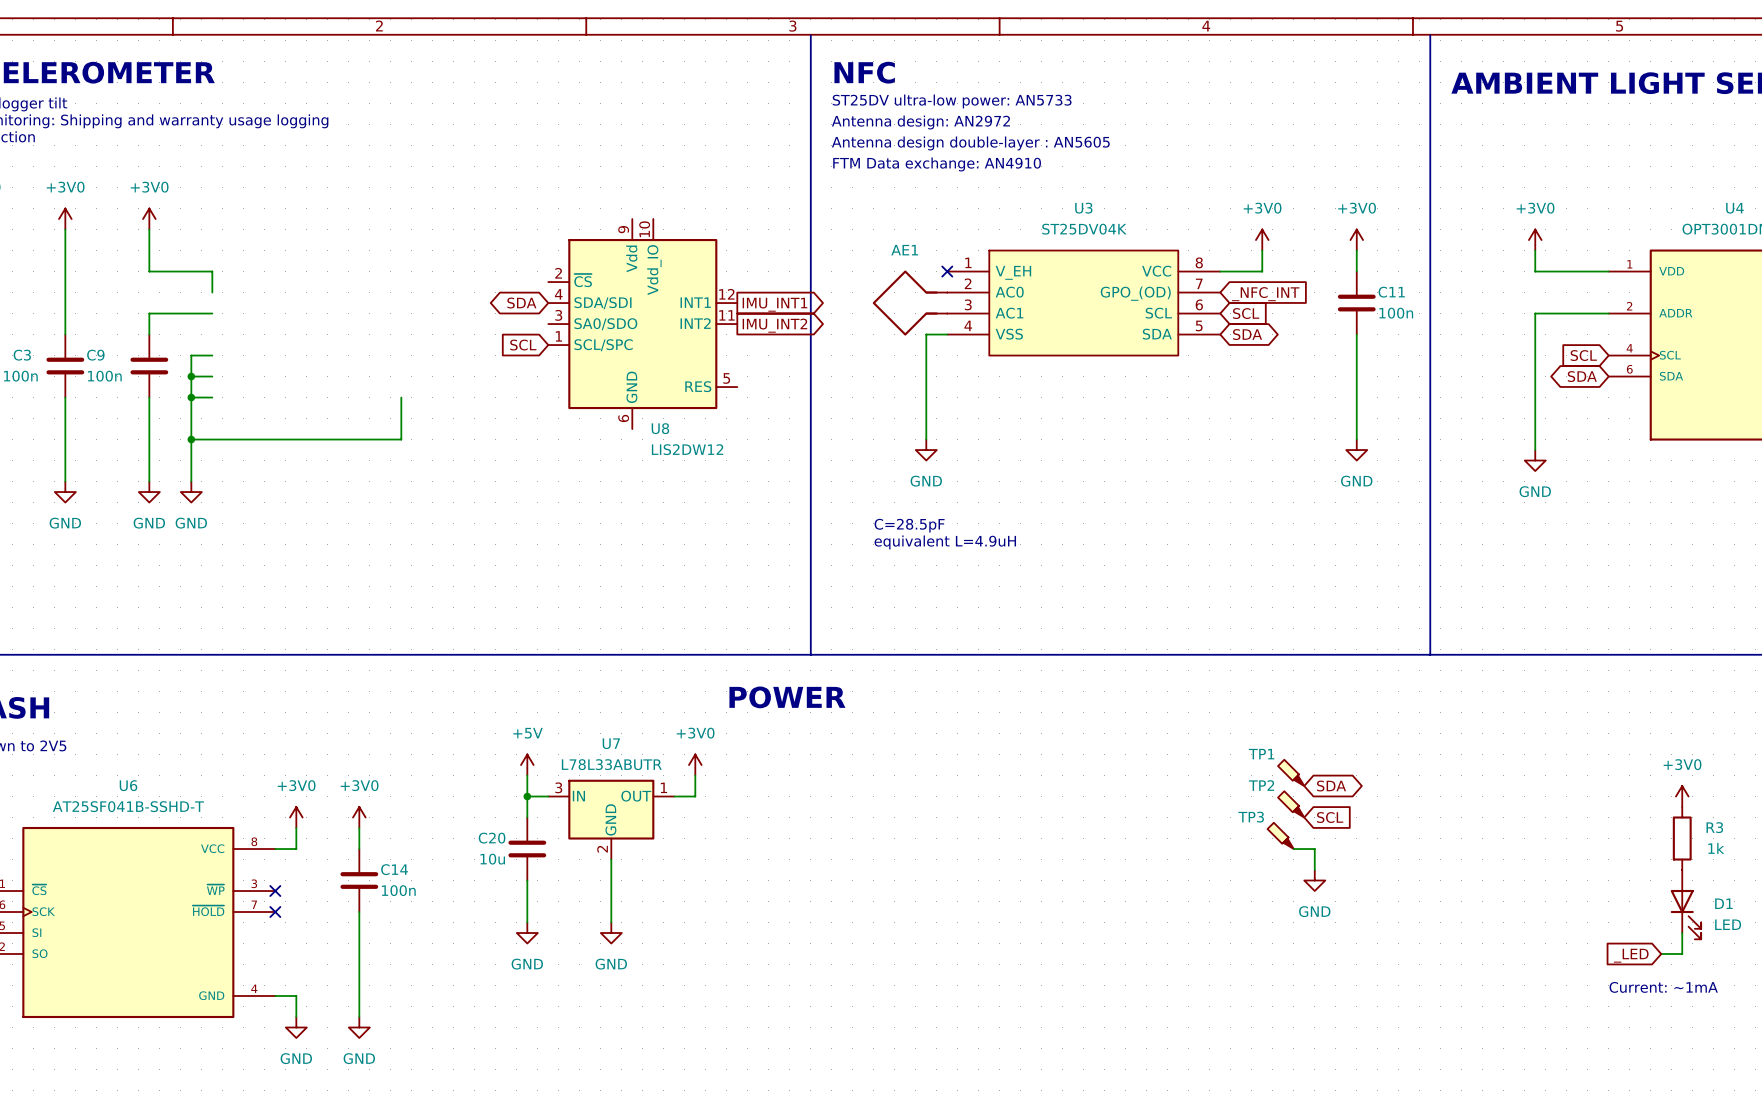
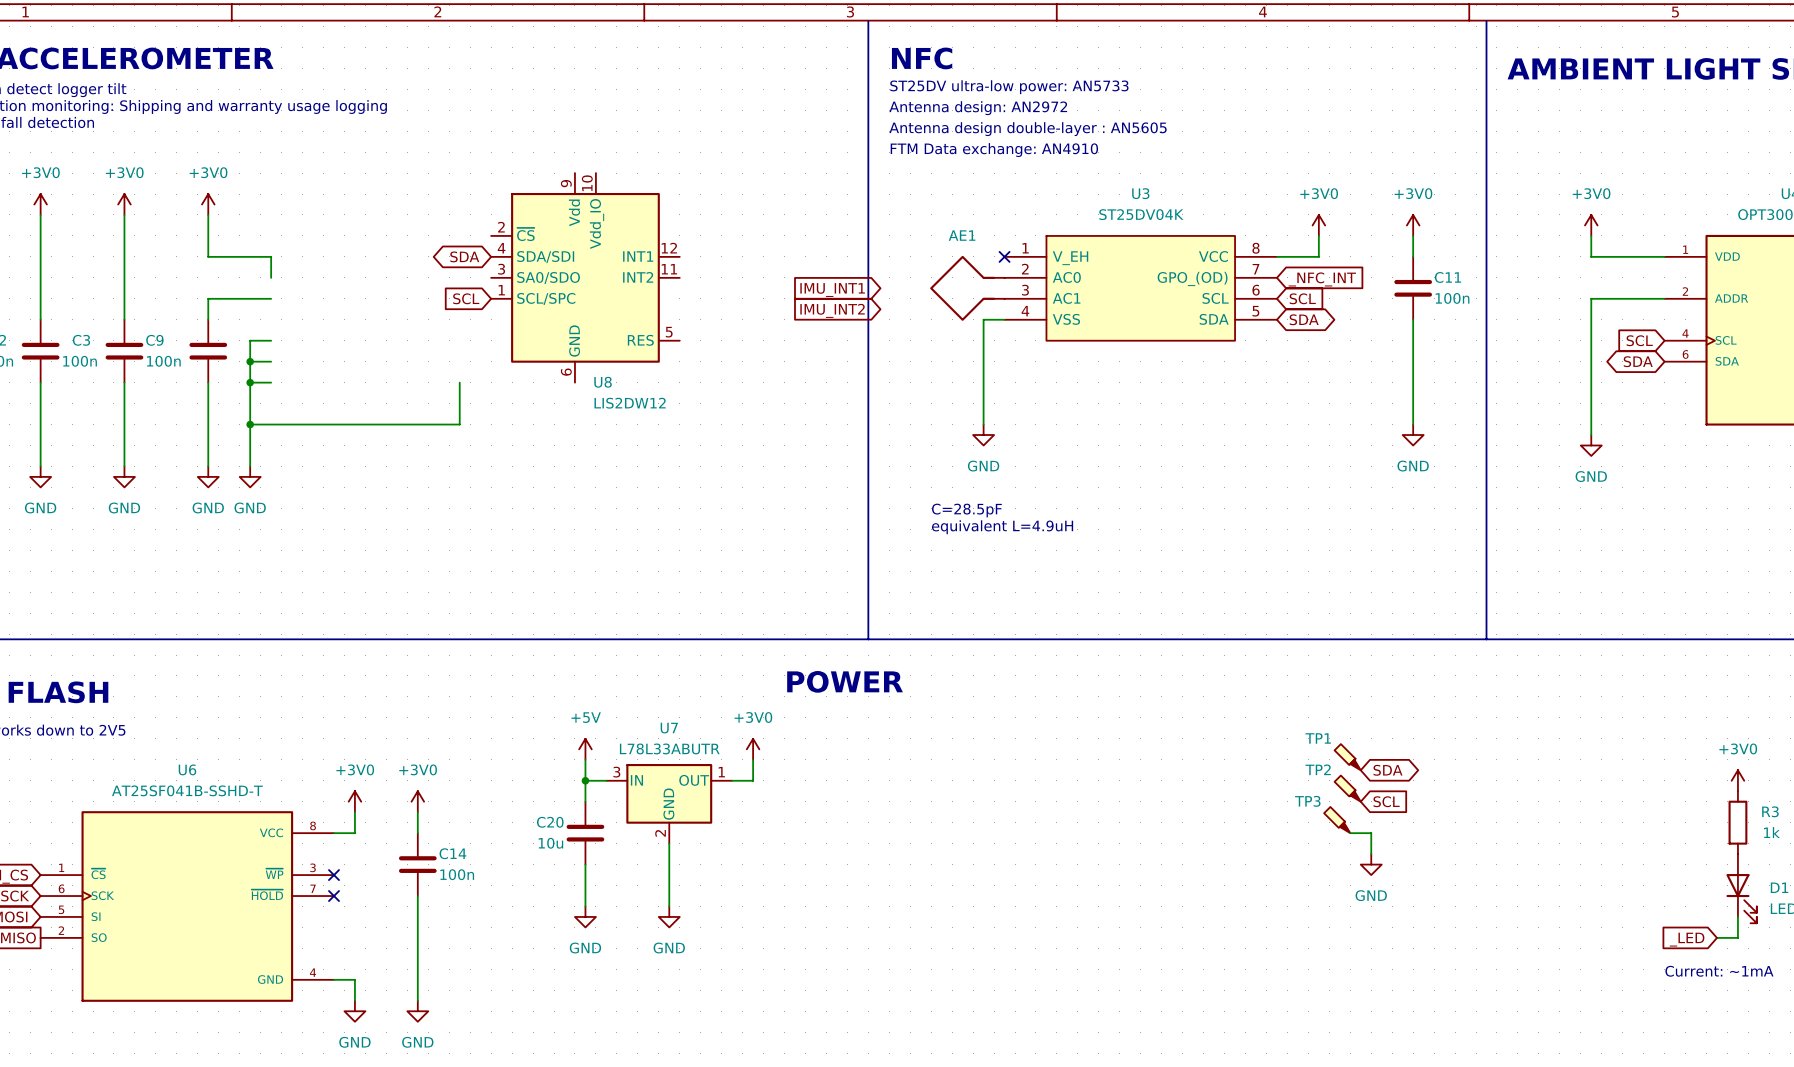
global label position: SDA (521, 303) -> SDA (464, 256)
U8 position: (642, 324) -> (585, 277)
global label position: SCL (523, 345) -> SCL (466, 298)

